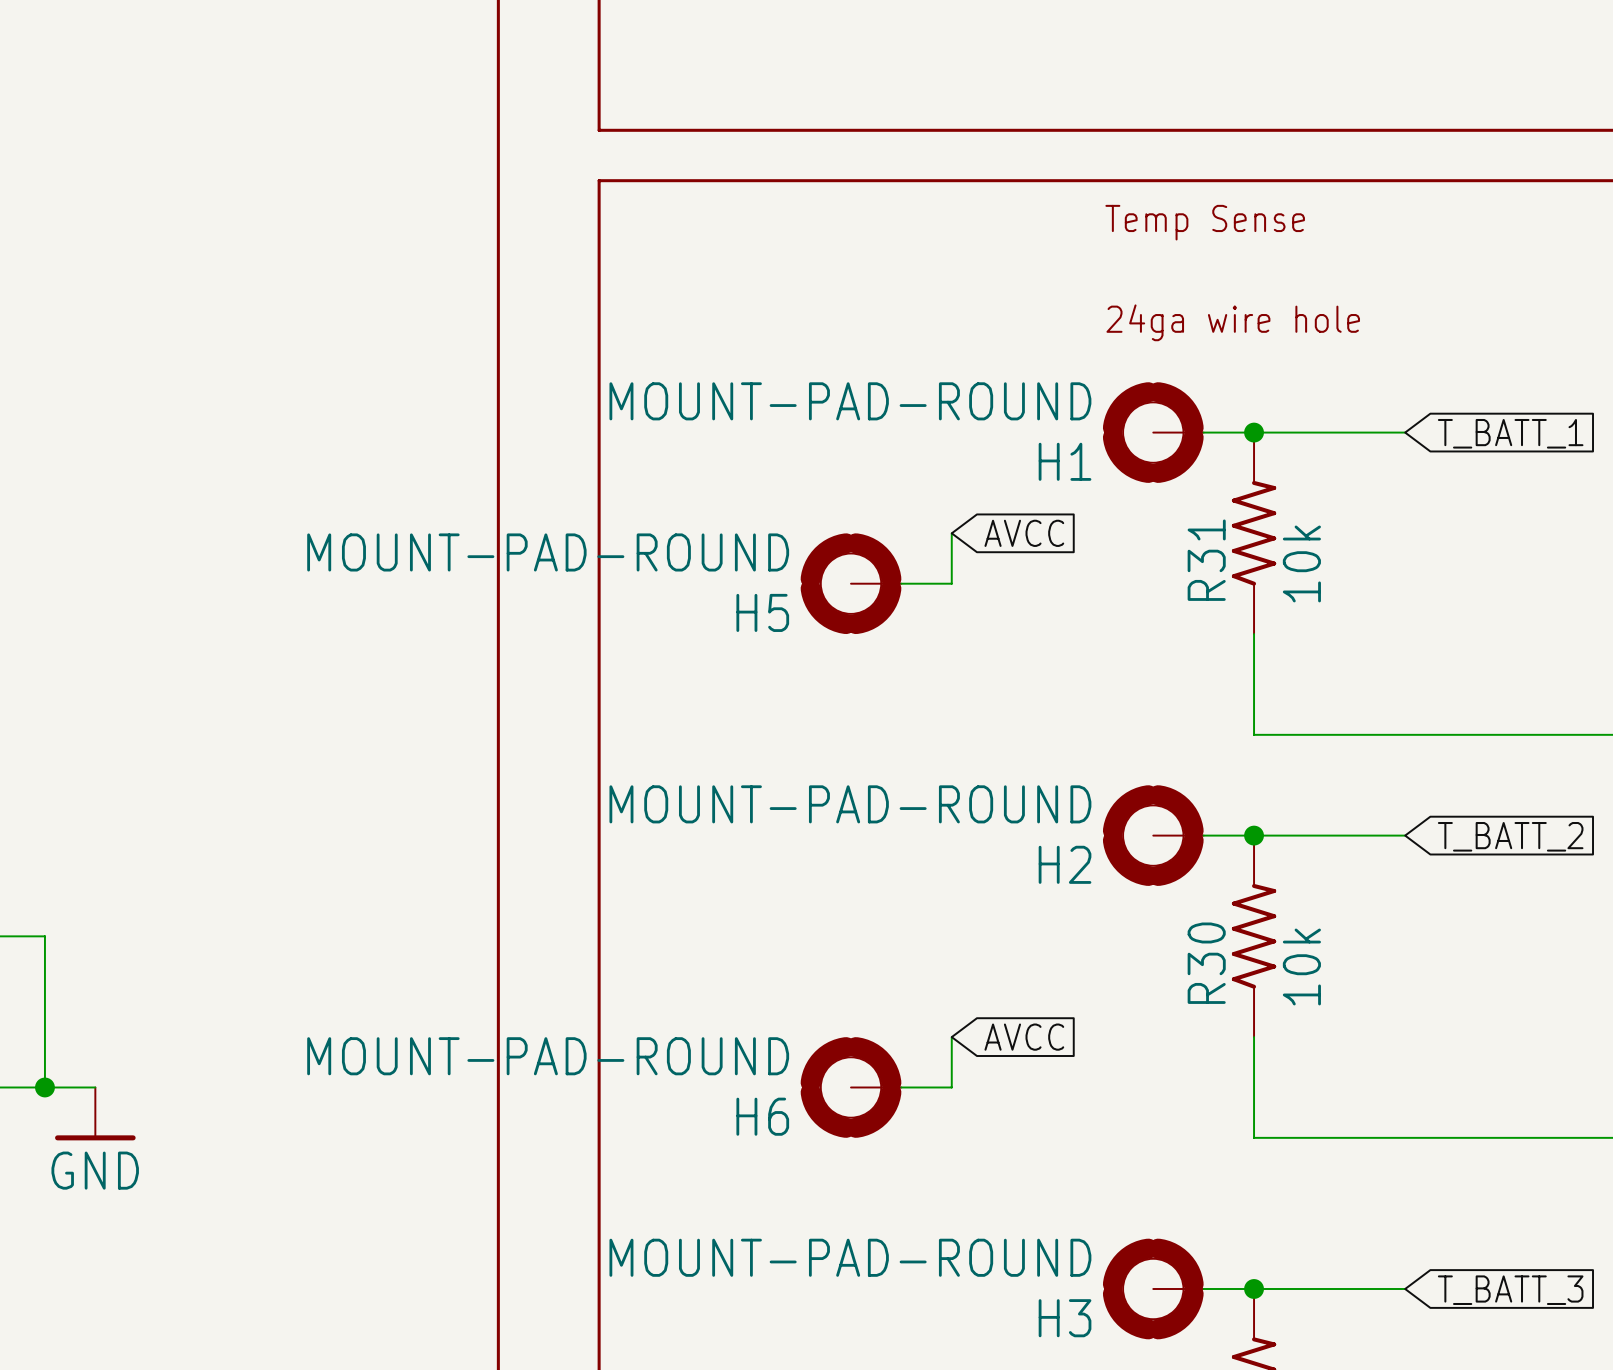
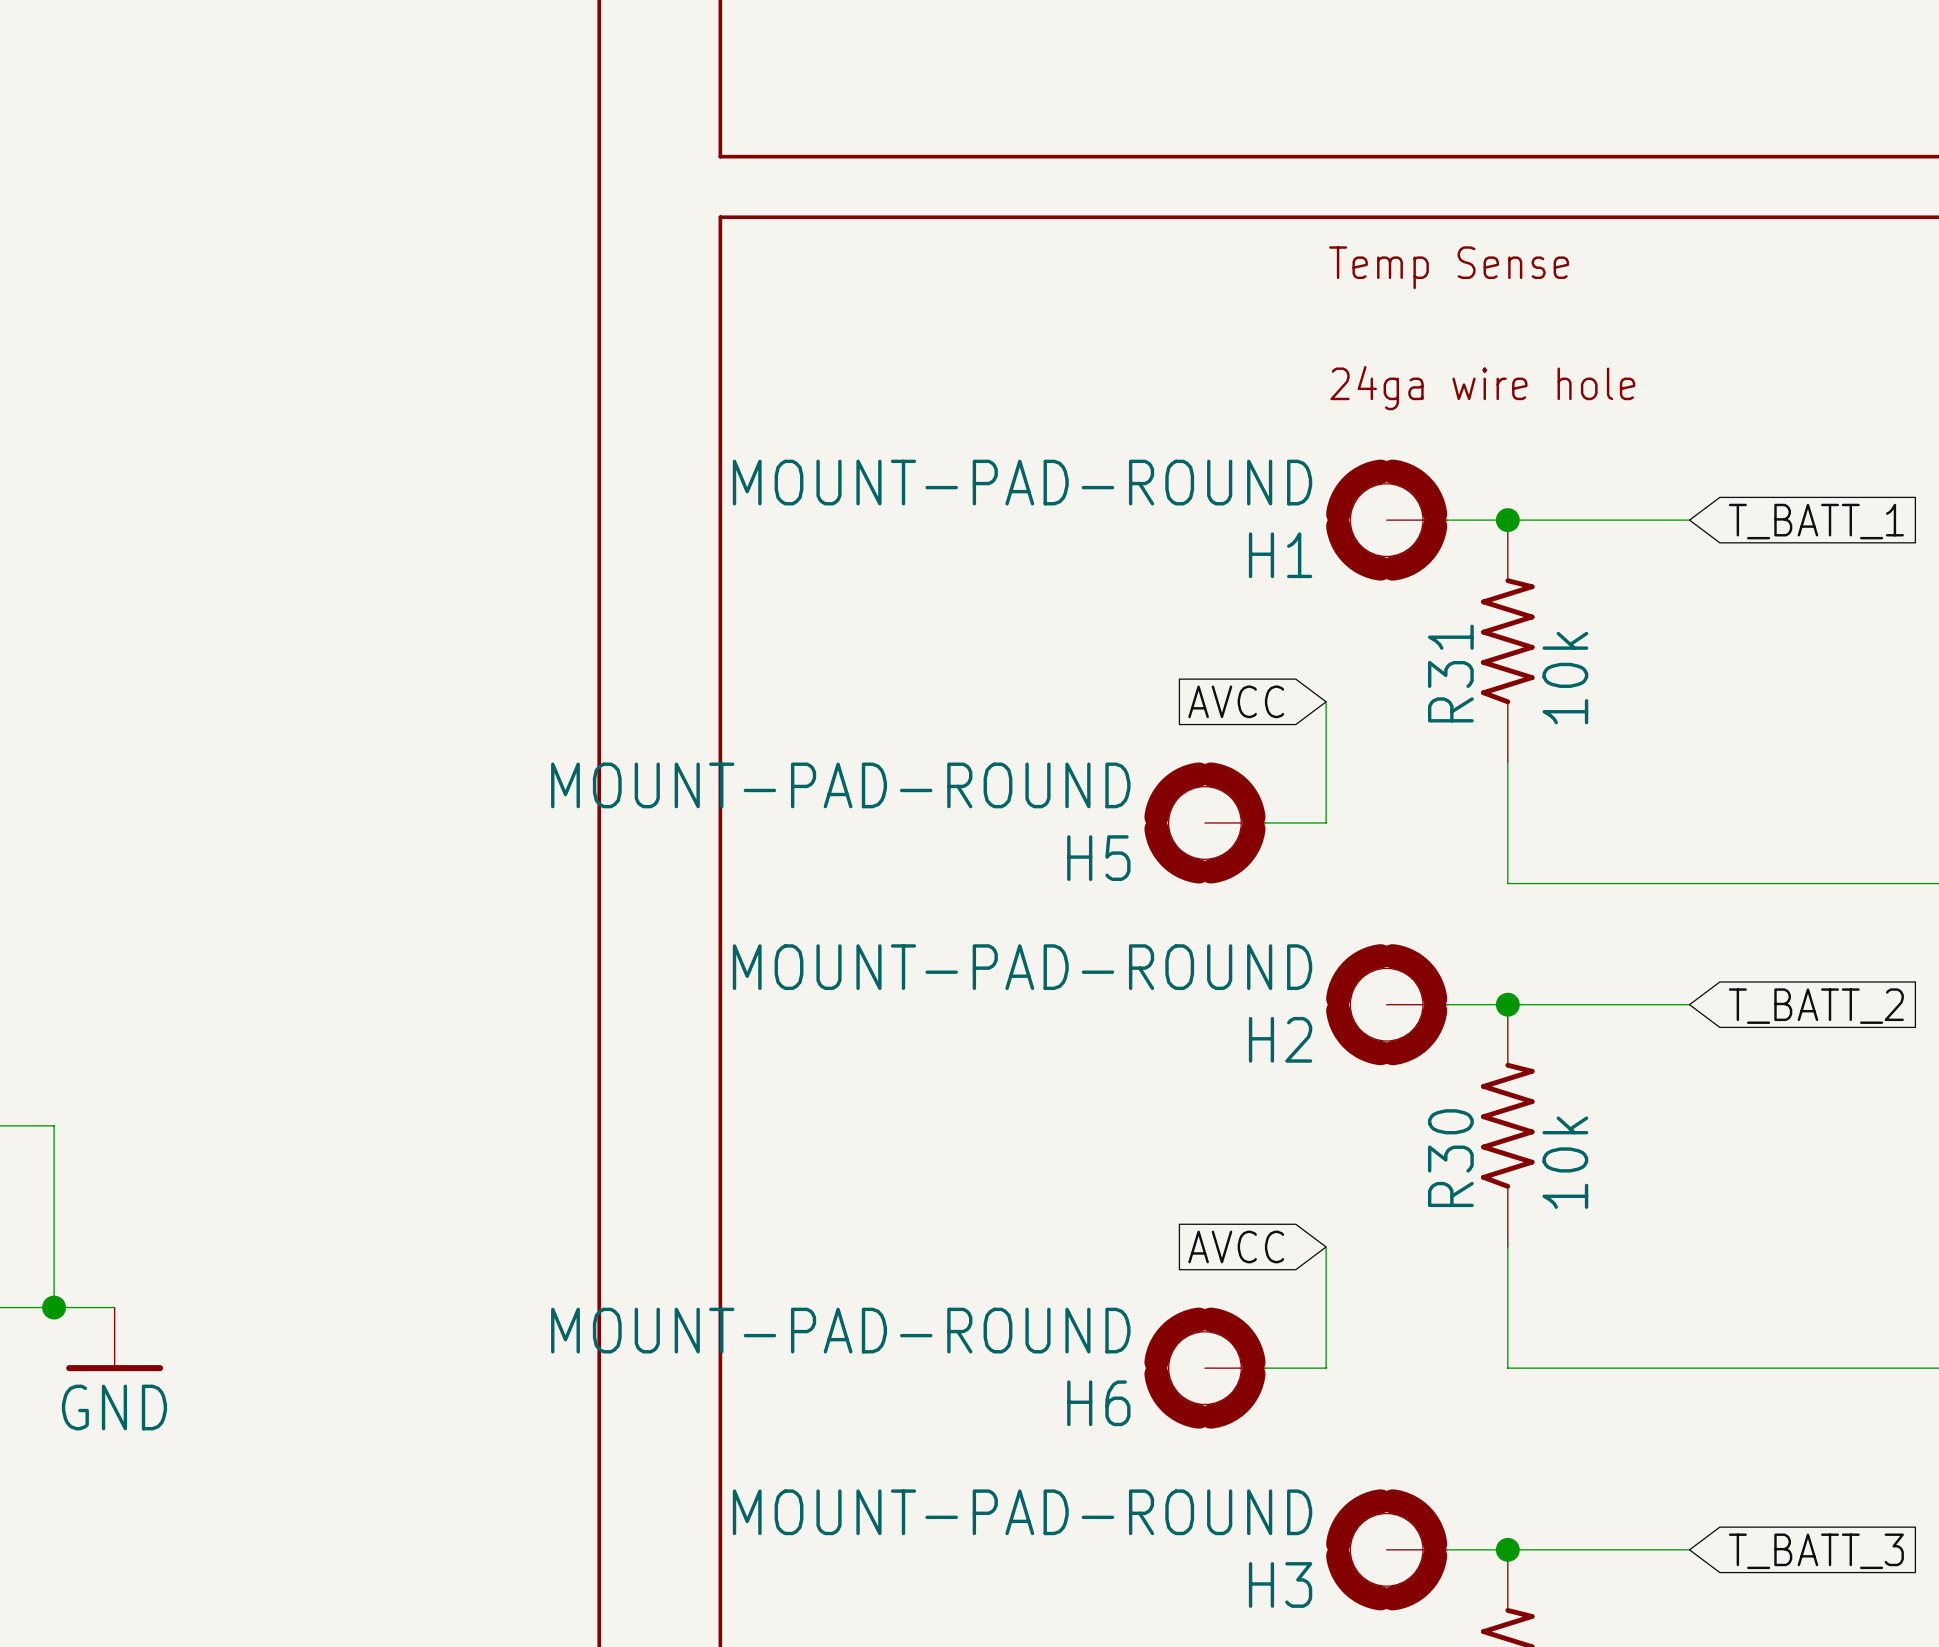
wire: (951, 533) (951, 583) (901, 583) -> none
global label rotation: 0° (1024, 533) -> 180° (1236, 701)
H5 position: (851, 583) -> (1204, 822)
wire: none -> (1326, 701) (1326, 822) (1265, 822)
wire: (951, 1037) (951, 1087) (901, 1087) -> none
global label rotation: 0° (1024, 1037) -> 180° (1236, 1246)
wire: none -> (1326, 1246) (1326, 1368) (1265, 1368)
H6 position: (851, 1087) -> (1204, 1368)

